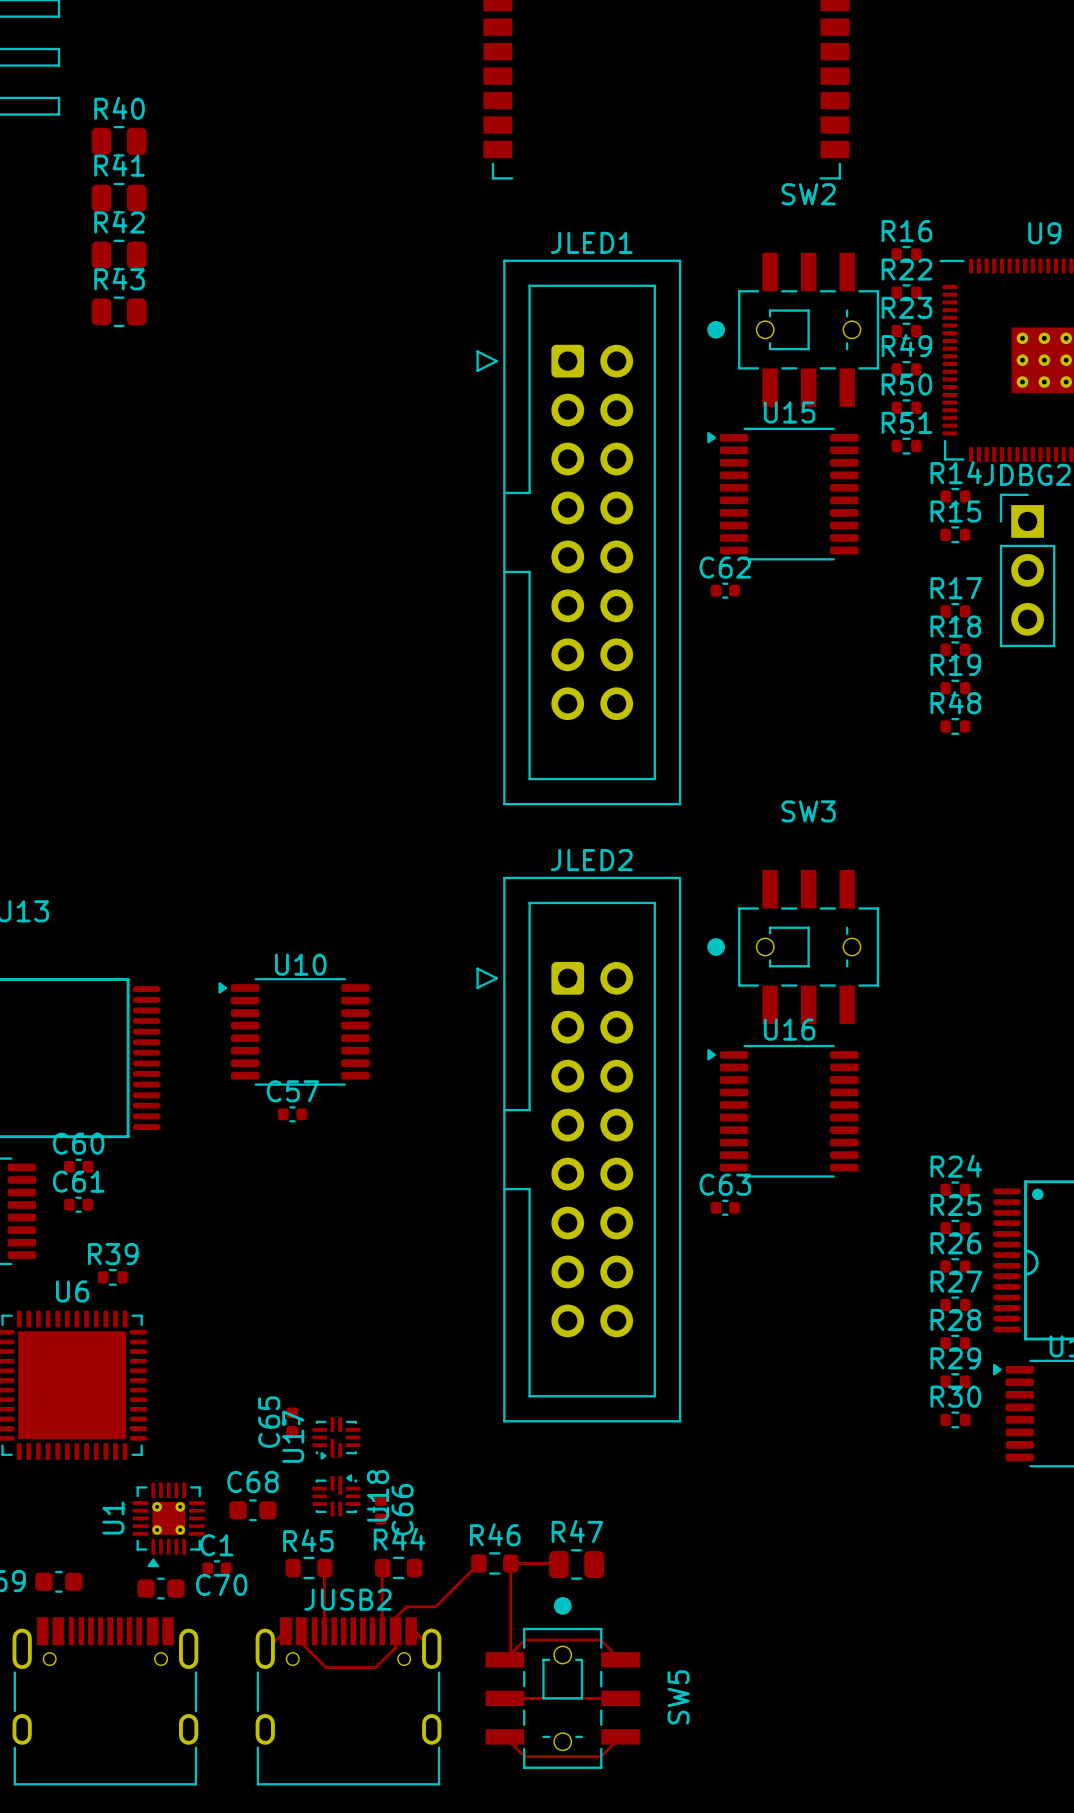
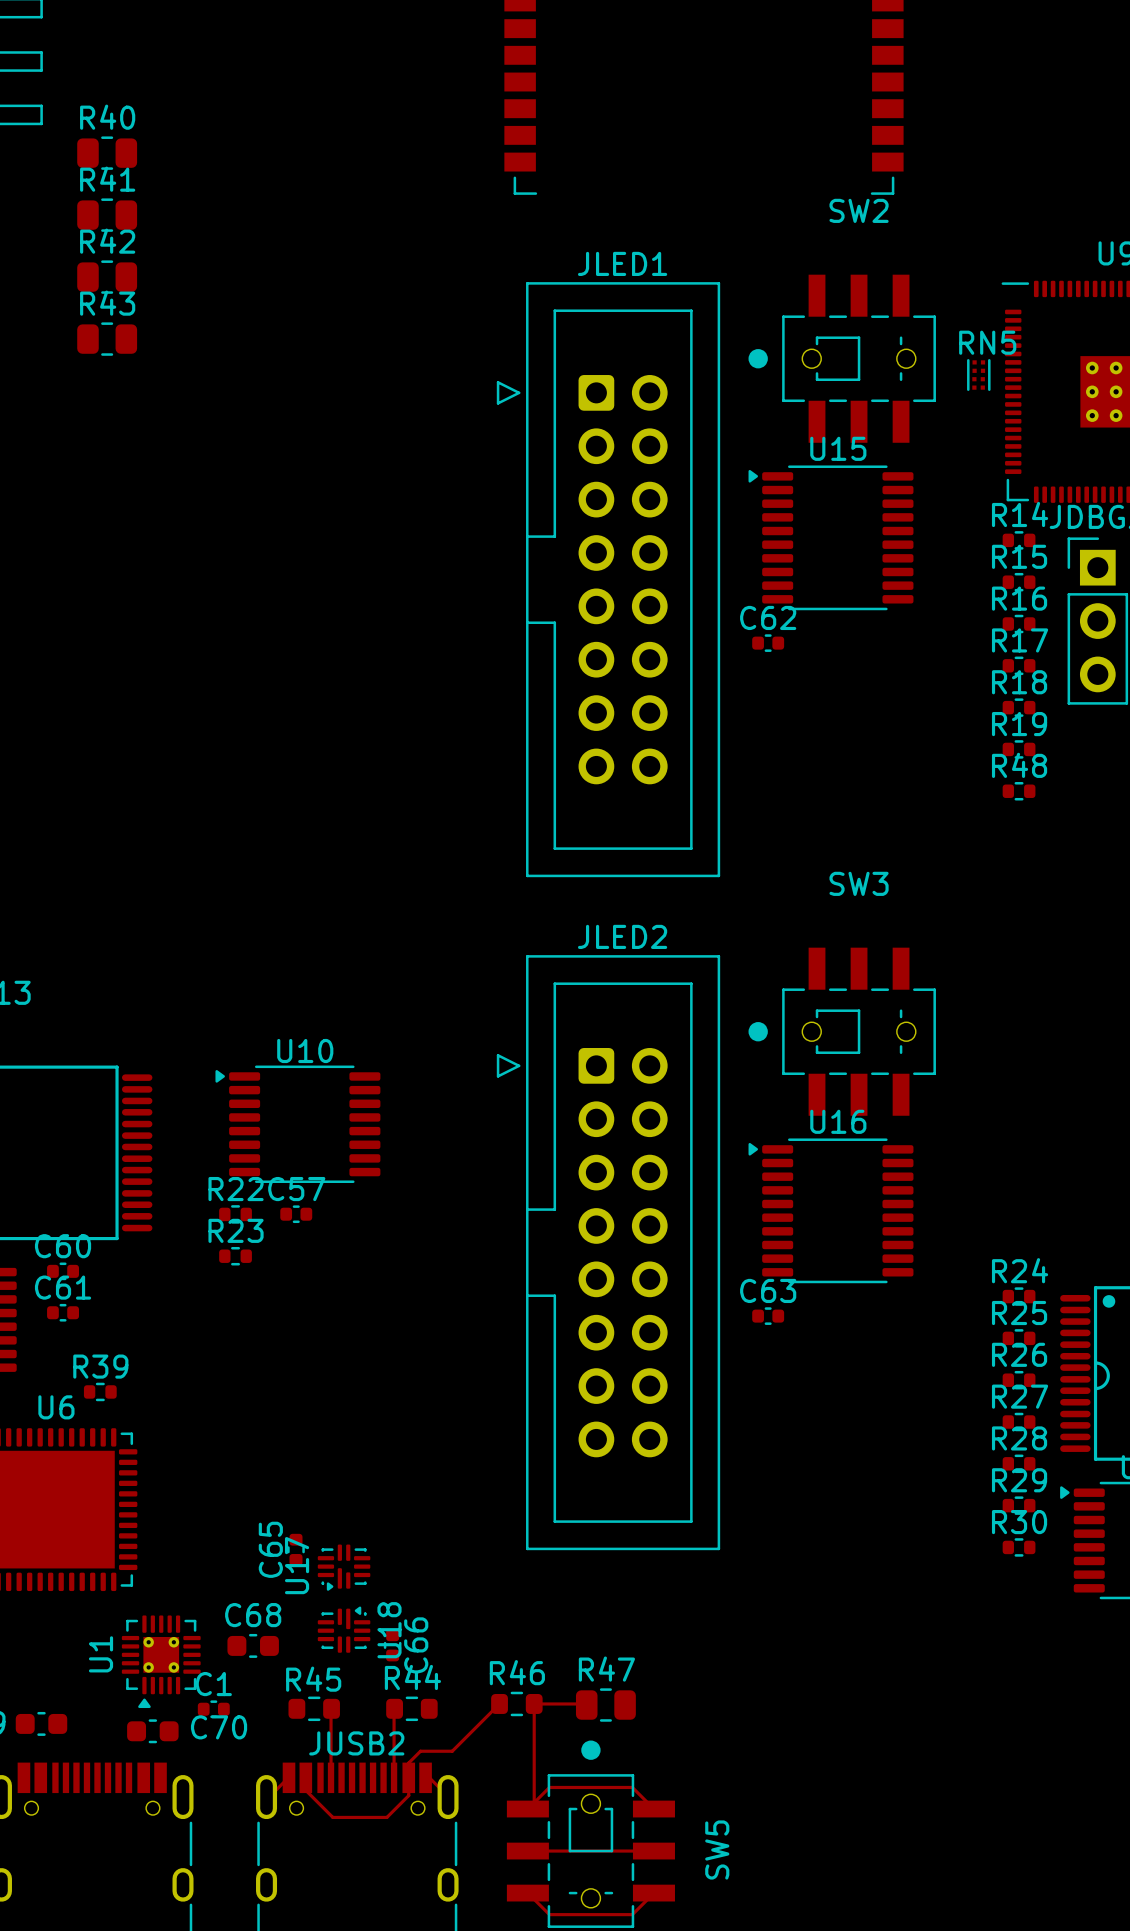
R16 position: (906, 254) -> (1019, 623)
R22 position: (906, 292) -> (235, 1214)
R23 position: (906, 331) -> (235, 1256)
RN5: none -> (978, 375)
R49: (906, 369) -> none
R50: (906, 407) -> none
R51: (906, 446) -> none

